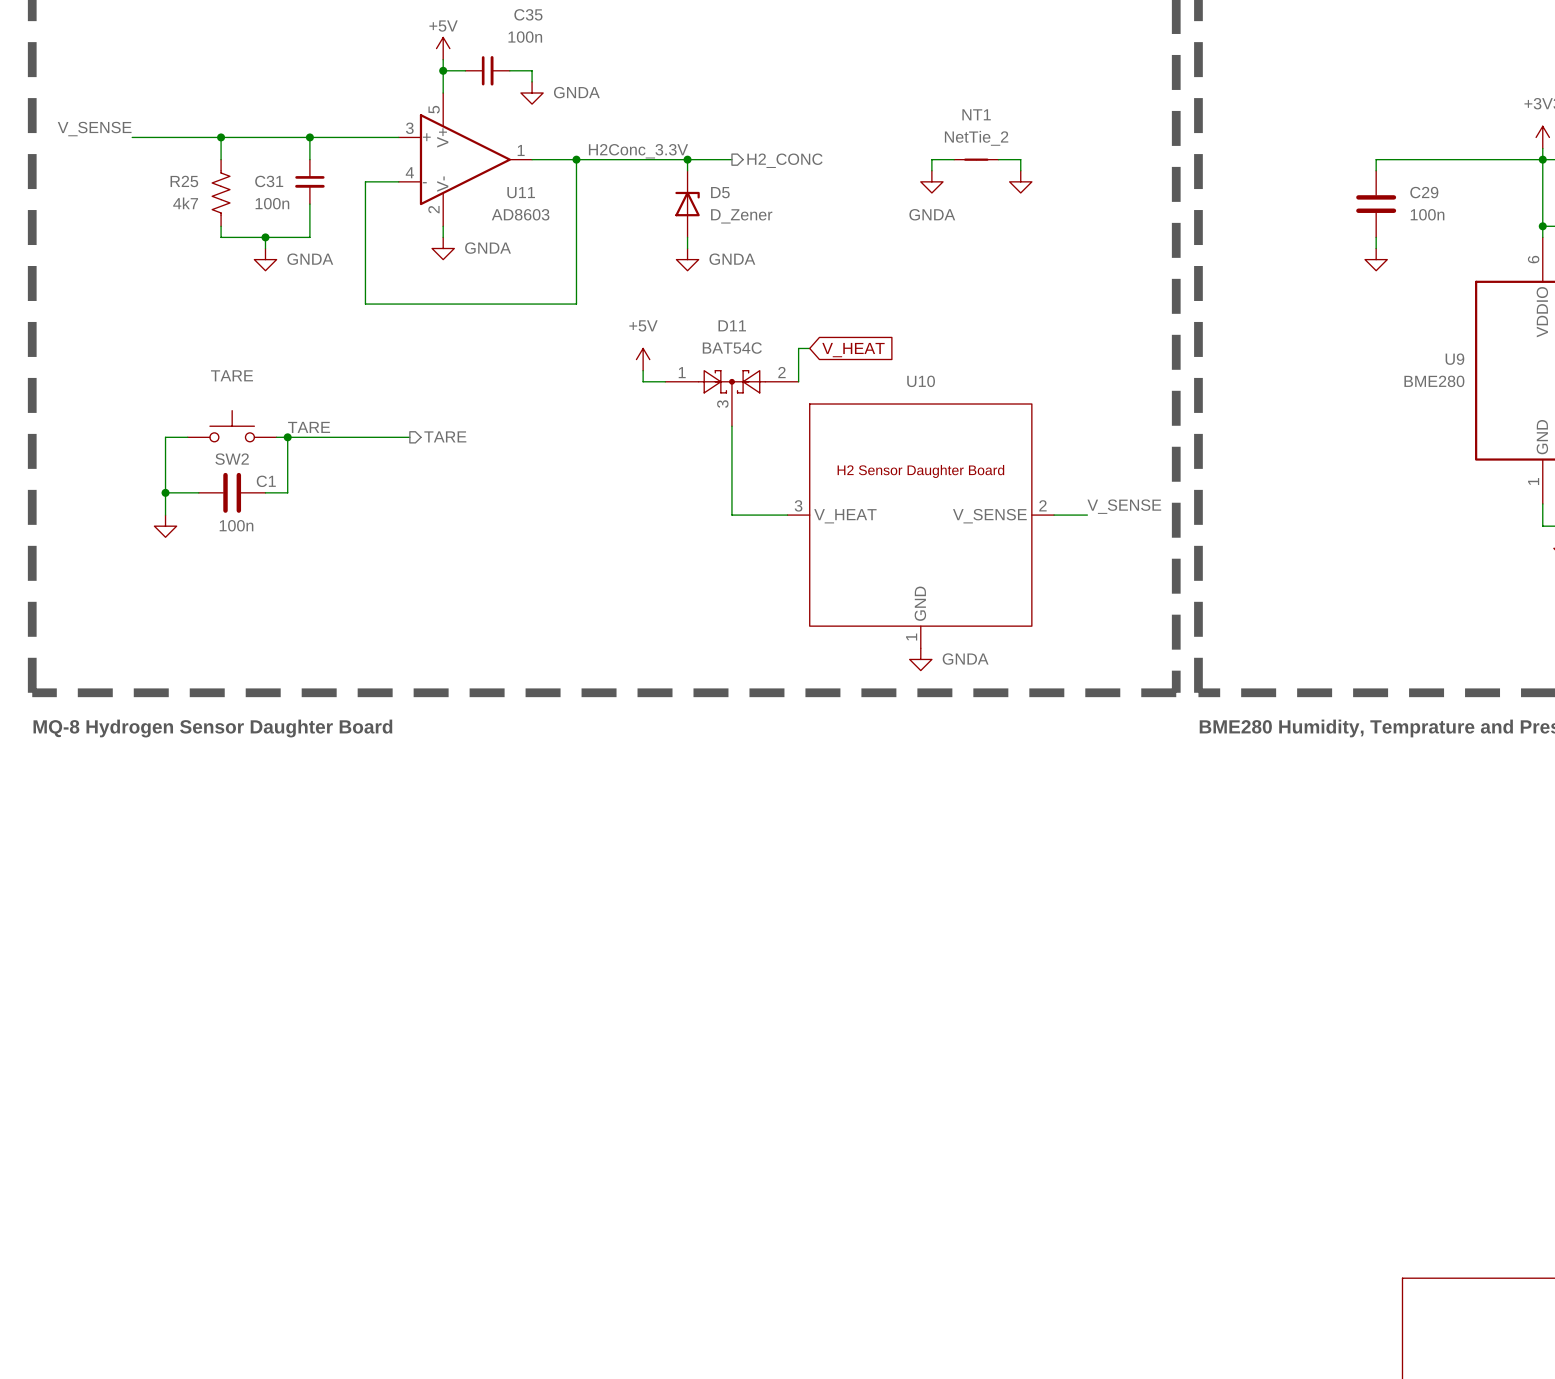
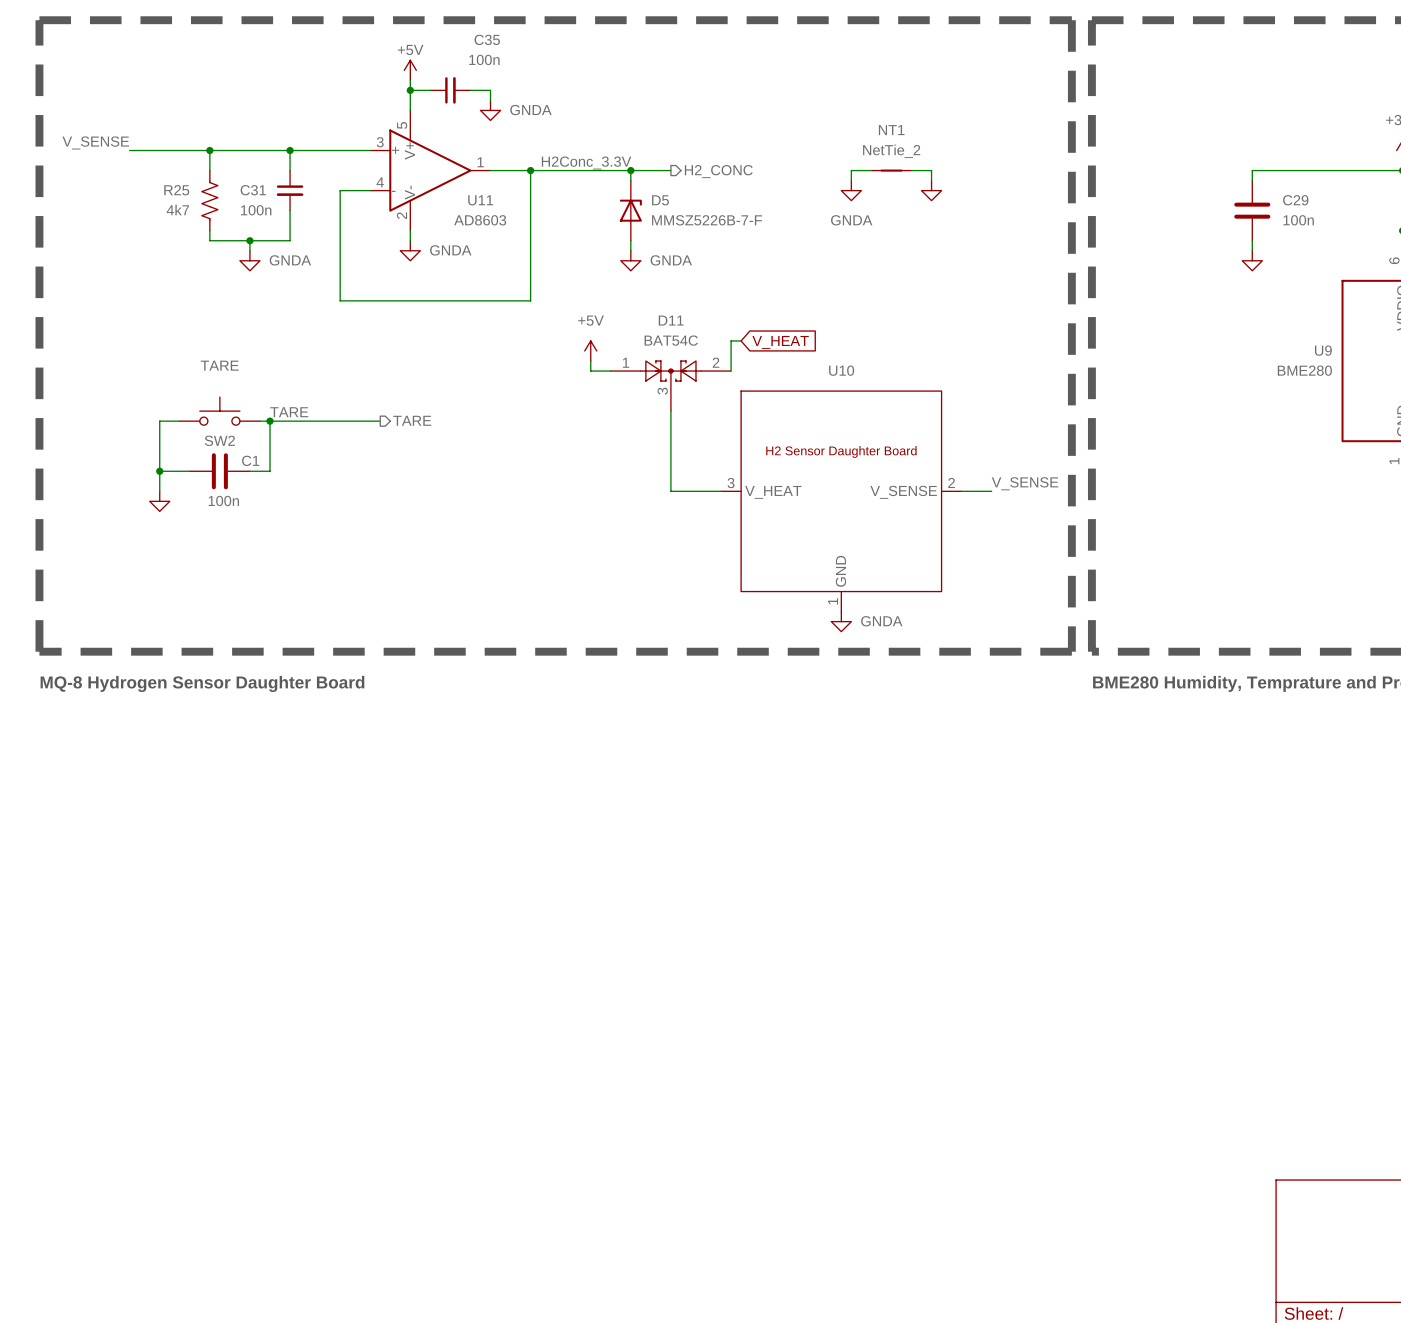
D5 value: D_Zener (741, 216) -> MMSZ5226B-7-F (707, 220)

